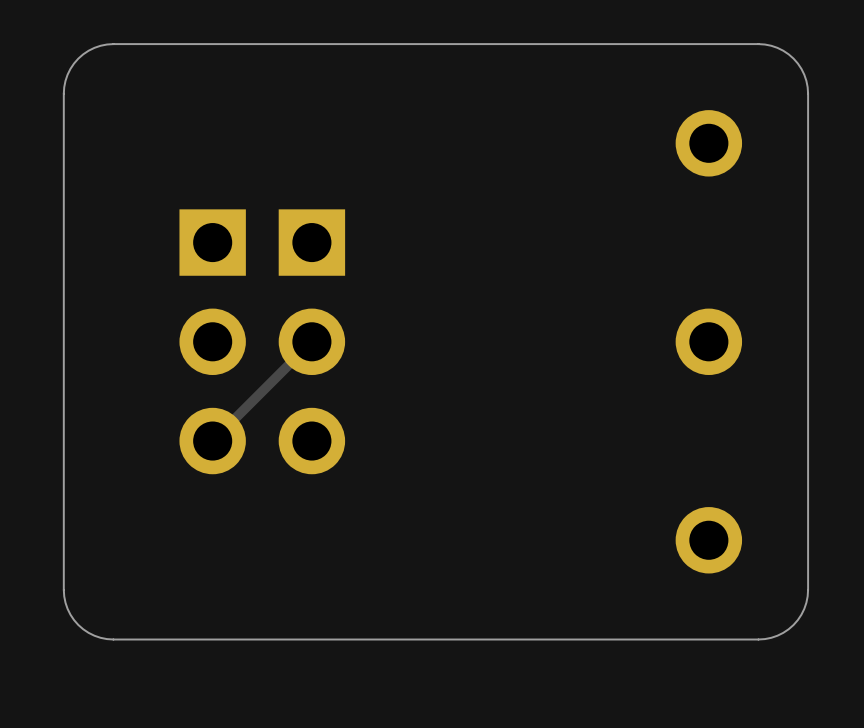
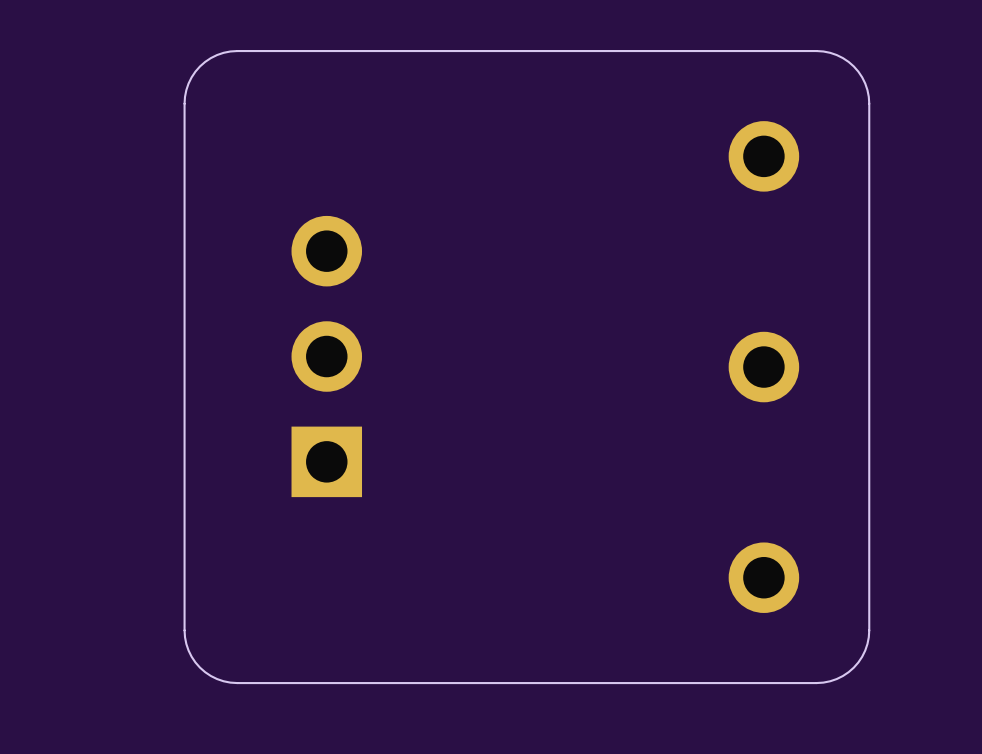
board edge: (212, 44) (100, 45) (88, 50) (74, 63) (65, 80) (63, 93) (63, 589) (65, 602) (70, 614) (78, 624) (88, 632) (100, 637) (212, 639) -> (237, 51) (217, 55) (199, 66) (188, 83) (184, 103) (185, 637) (188, 650) (199, 667) (217, 679) (237, 683)
part: (212, 341) -> none
track: (311, 341) (212, 441) -> none
part rotation: 0° (311, 341) -> 180° (326, 356)

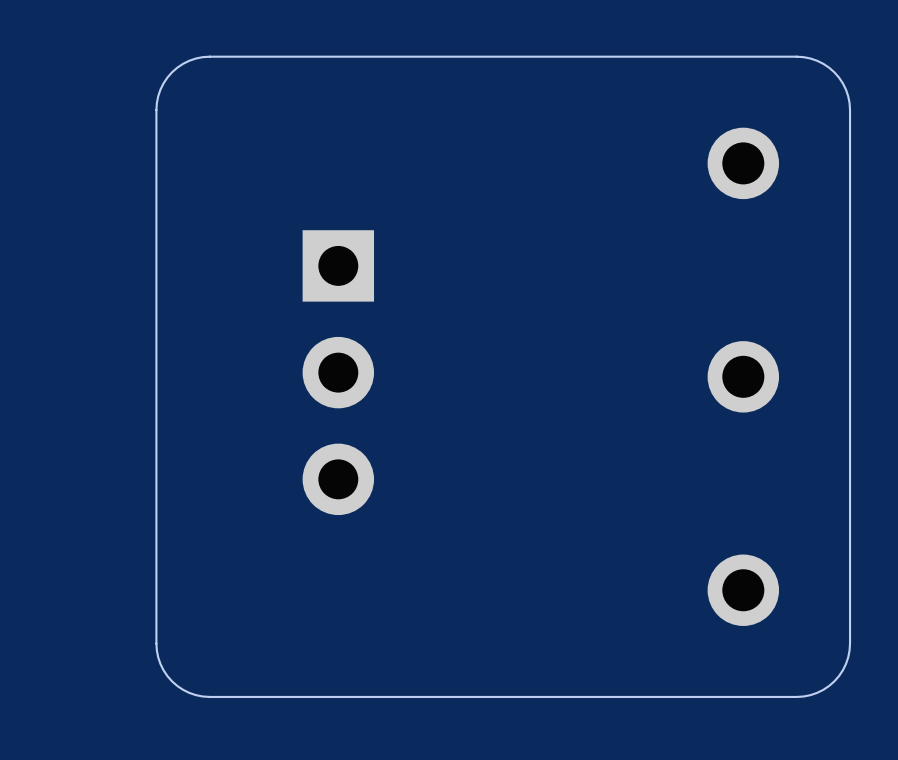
part footprint: [291, 215, 363, 498] -> [302, 230, 375, 516]

